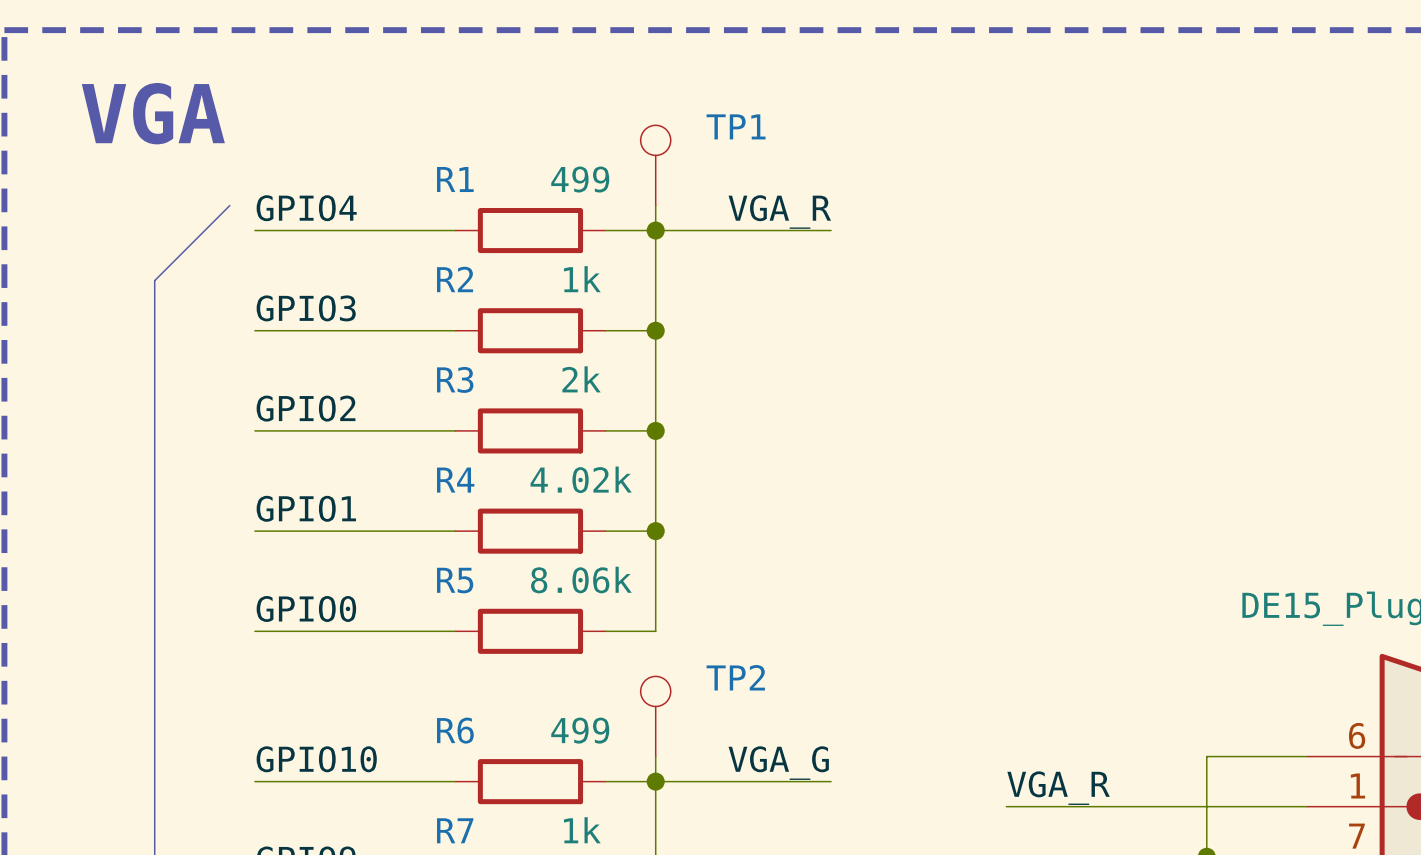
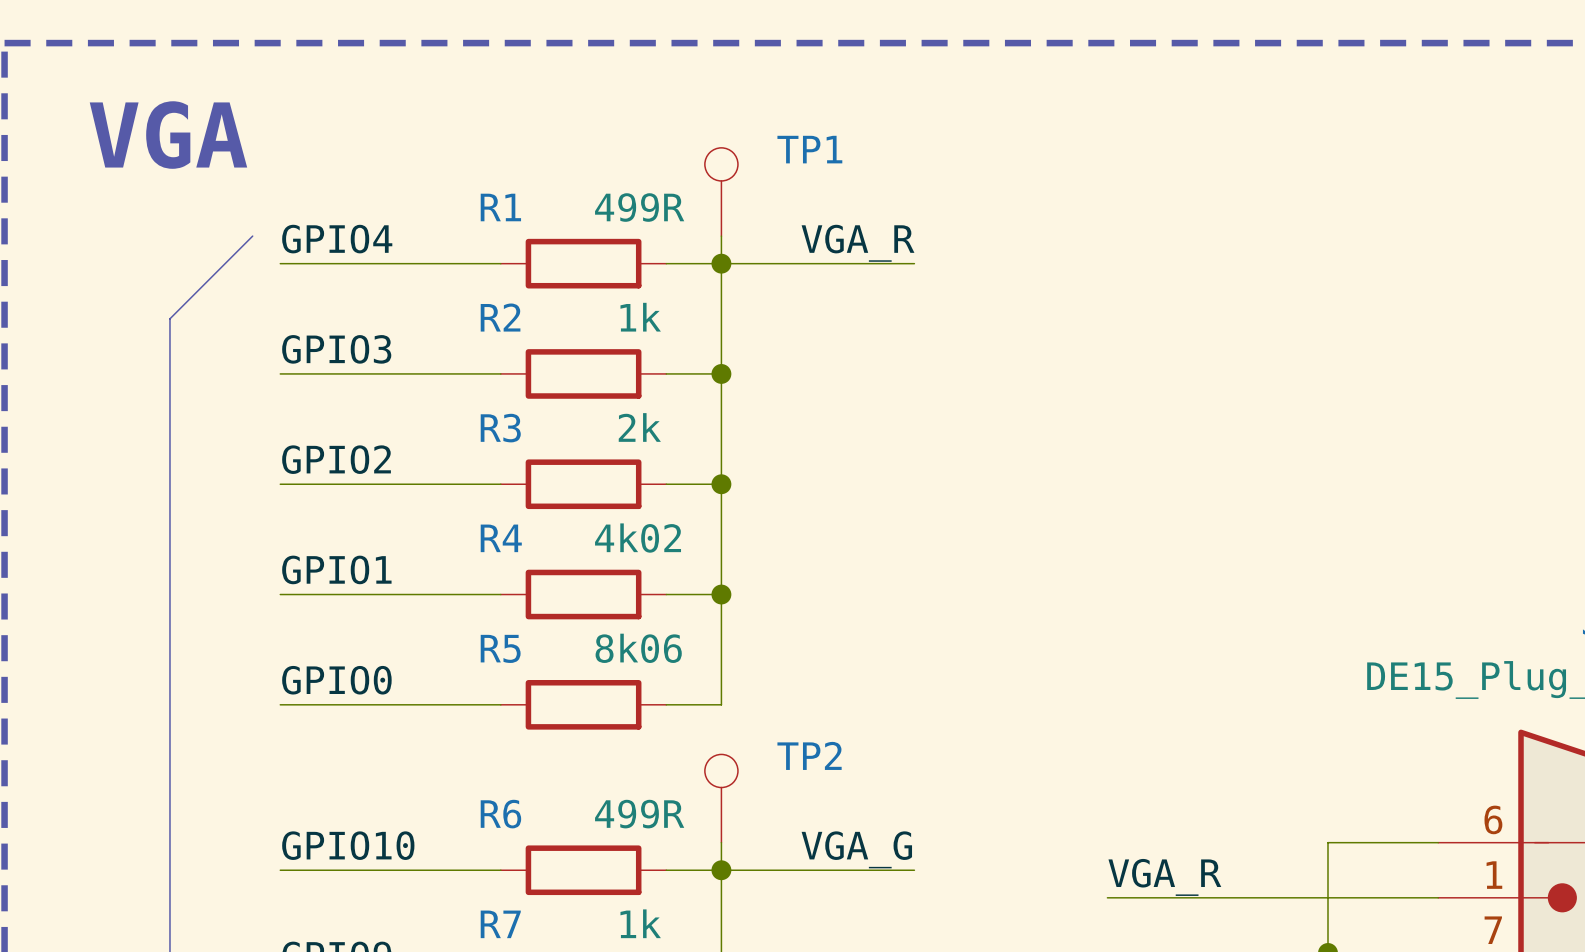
R1 value: 499 (580, 179) -> 499R (639, 207)
R4 value: 4.02k (581, 479) -> 4k02 (638, 538)
R5 value: 8.06k (581, 580) -> 8k06 (638, 648)
R6 value: 499 (580, 730) -> 499R (639, 814)

